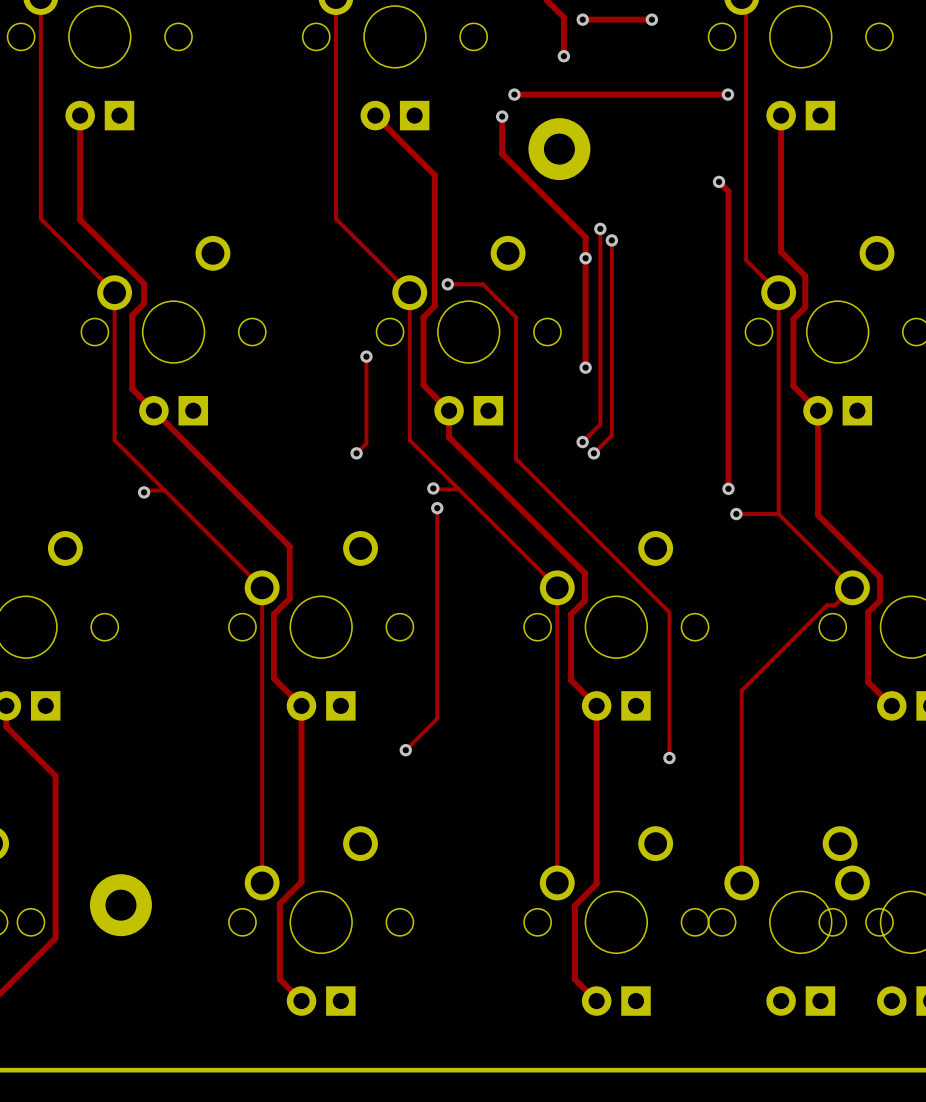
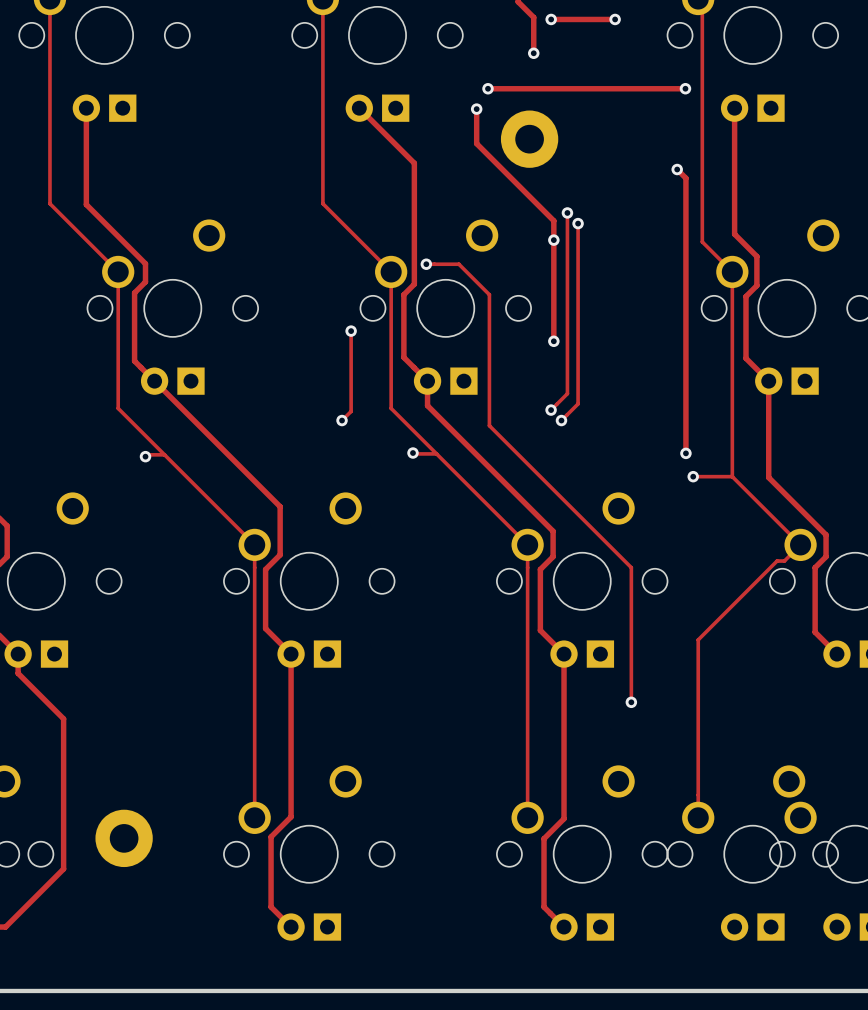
track: (437, 508) (437, 718) (405, 750) -> none
via: (437, 508) -> none
via: (405, 750) -> none

